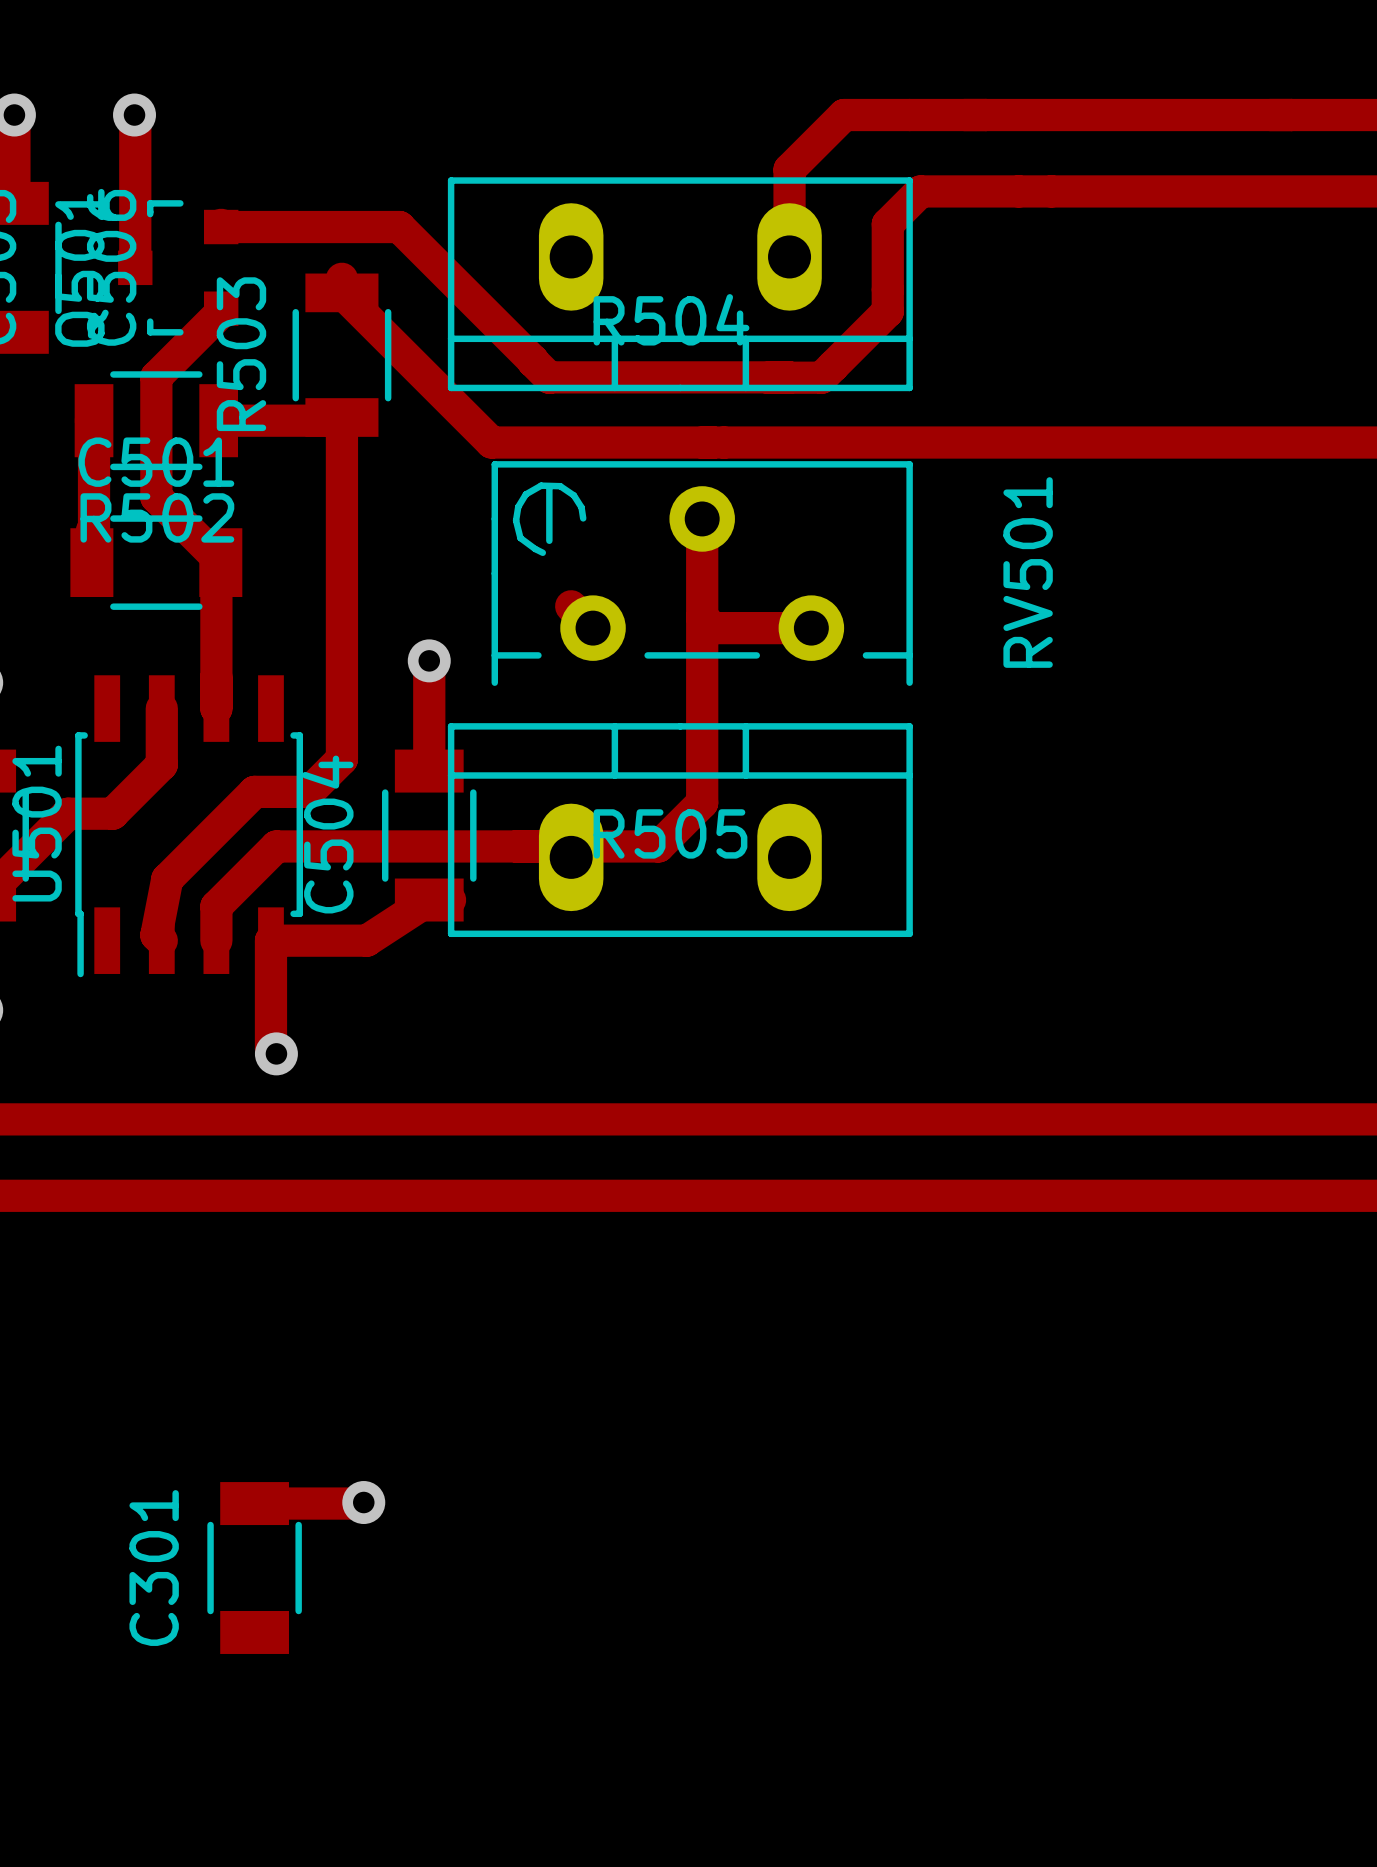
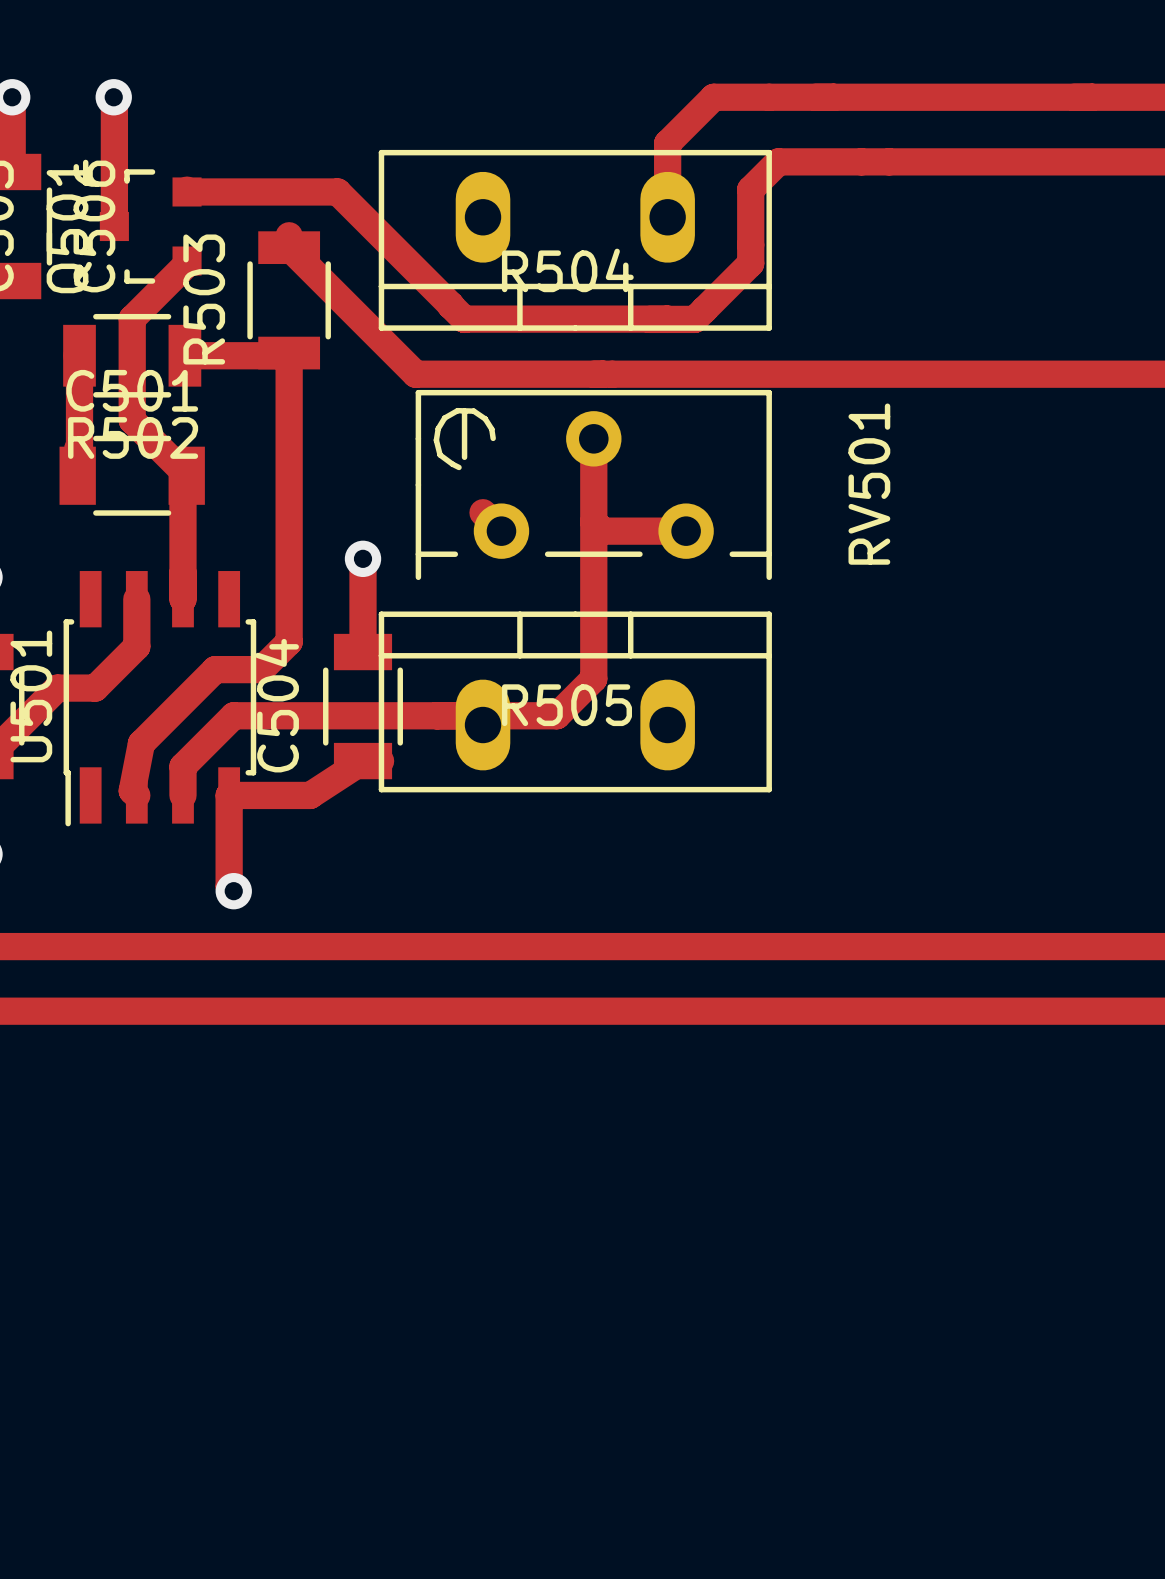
track: (363, 1502) (254, 1503) -> none
via: (363, 1502) -> none
C301: (254, 1568) -> none

